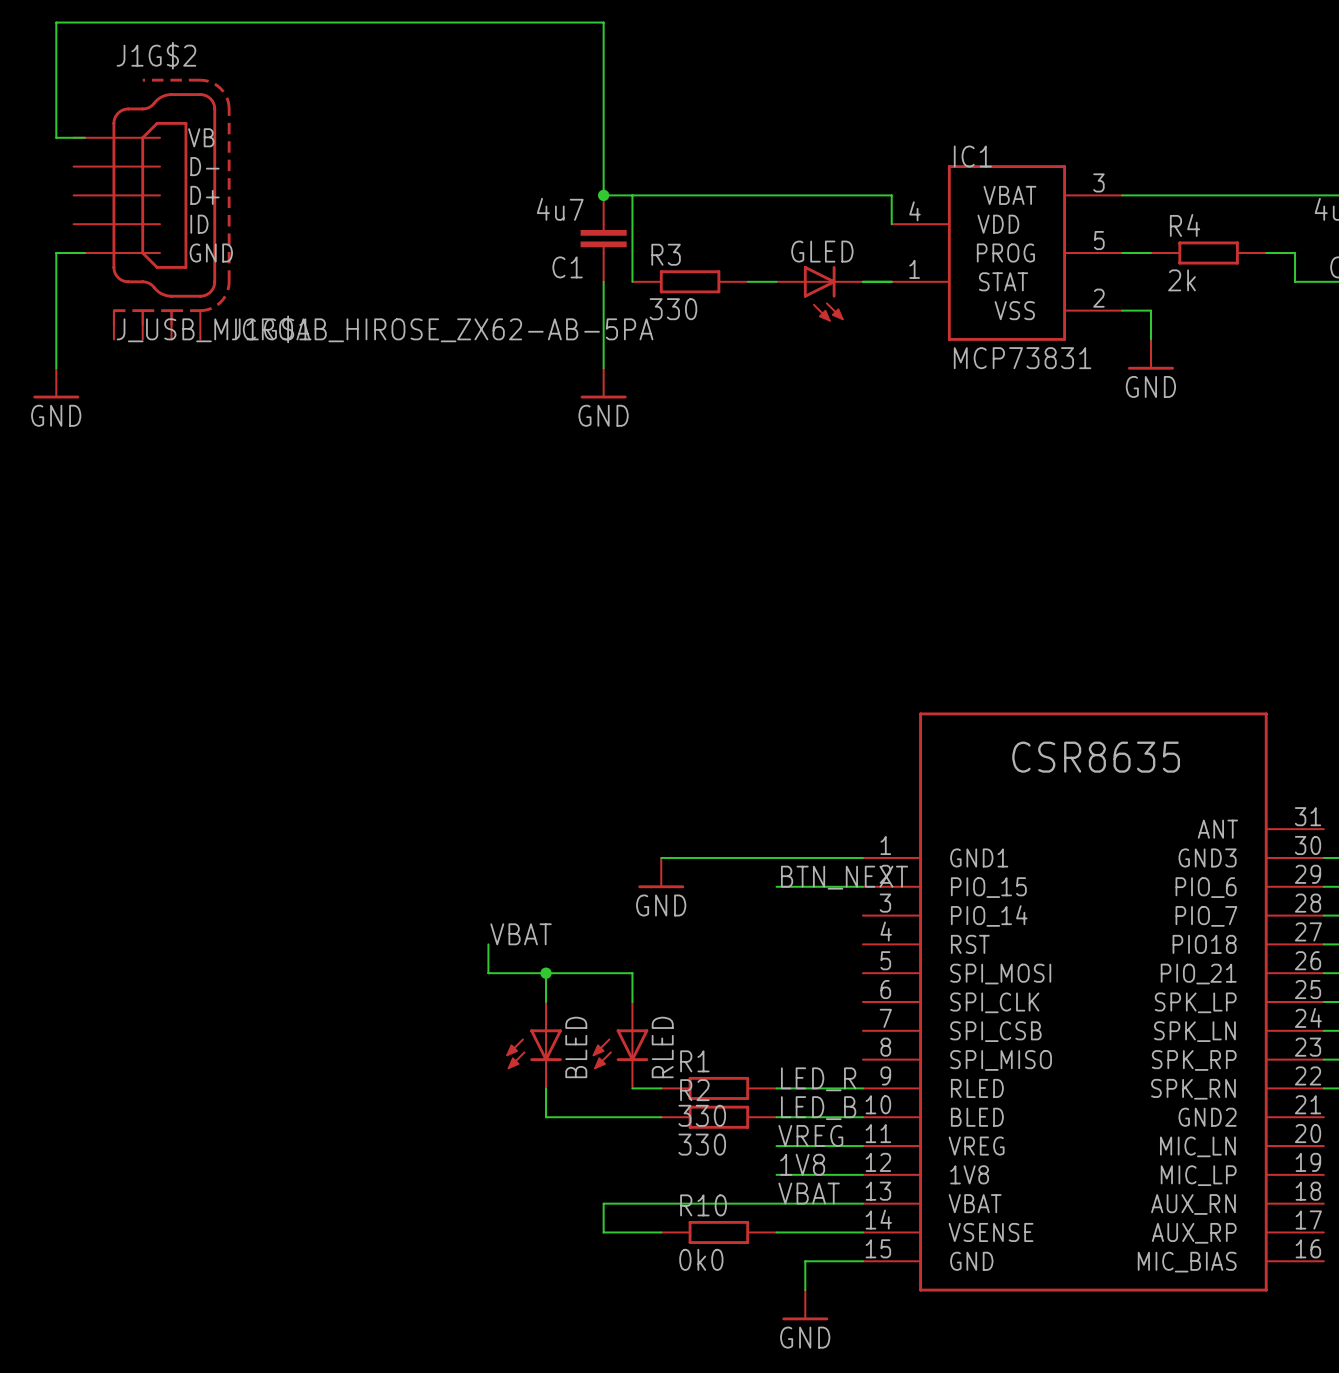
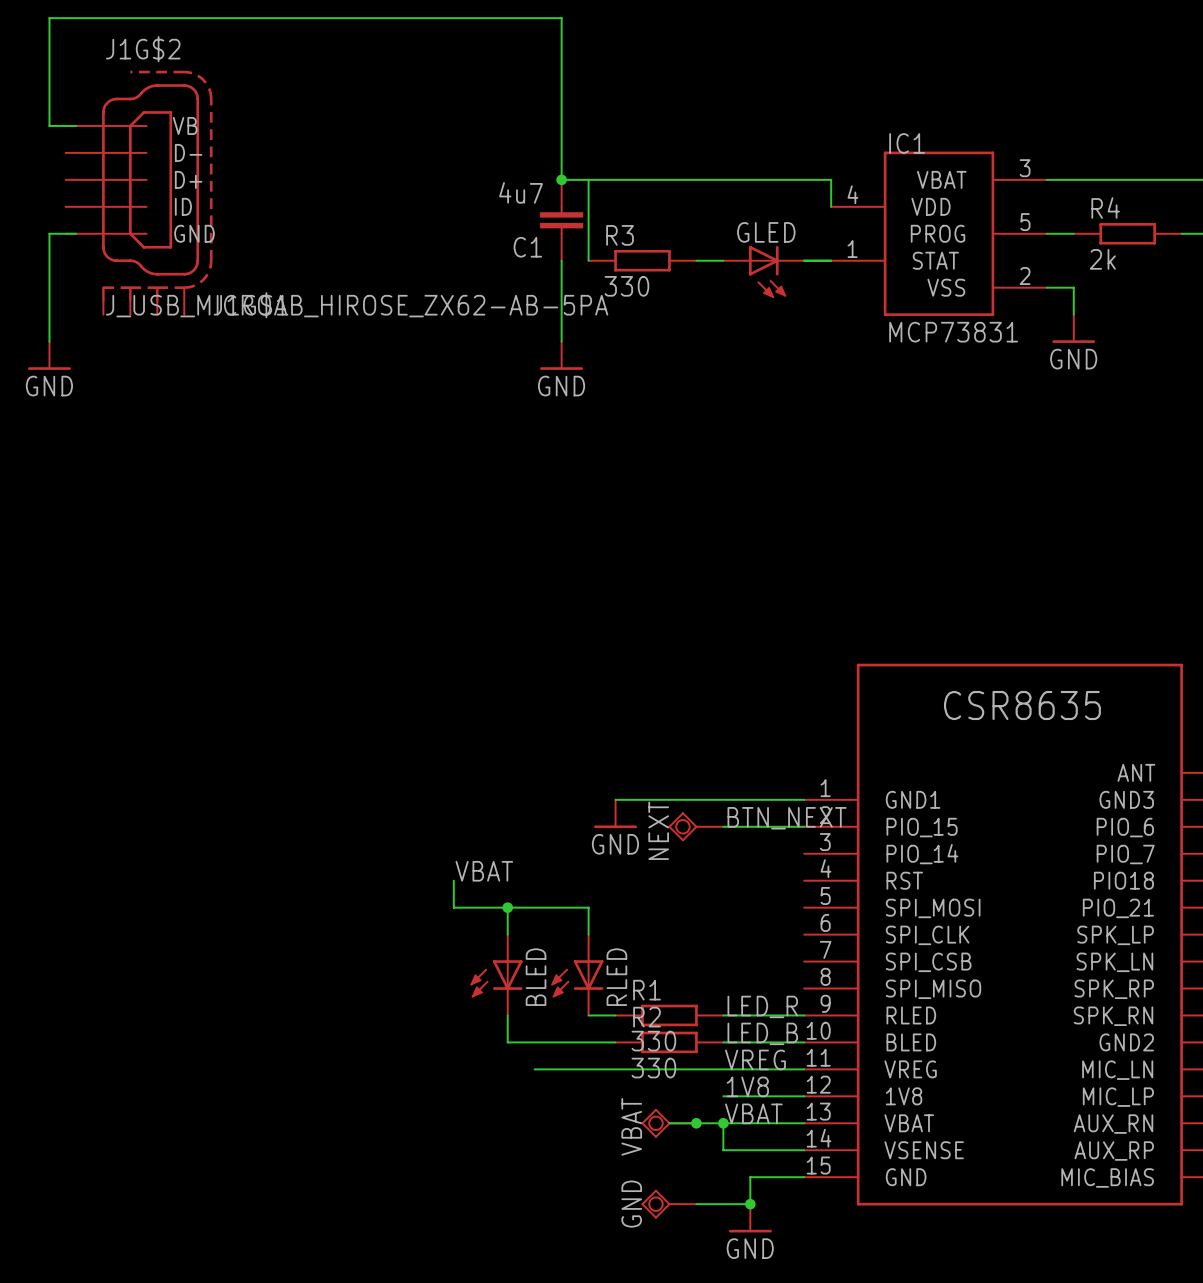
NEXT: none -> (696, 826)
wire: none -> (534, 1069) (723, 1069)
wire: (718, 1203) (603, 1203) (603, 1232) (661, 1232) -> none
VBAT: none -> (669, 1123)
junction: none -> (696, 1123)
wire: none -> (723, 1123) (723, 1150)
junction: none -> (723, 1123)
R10: 0k0 (718, 1232) -> none
GND: none -> (669, 1204)
wire: none -> (696, 1204) (750, 1204)
junction: none -> (750, 1204)

